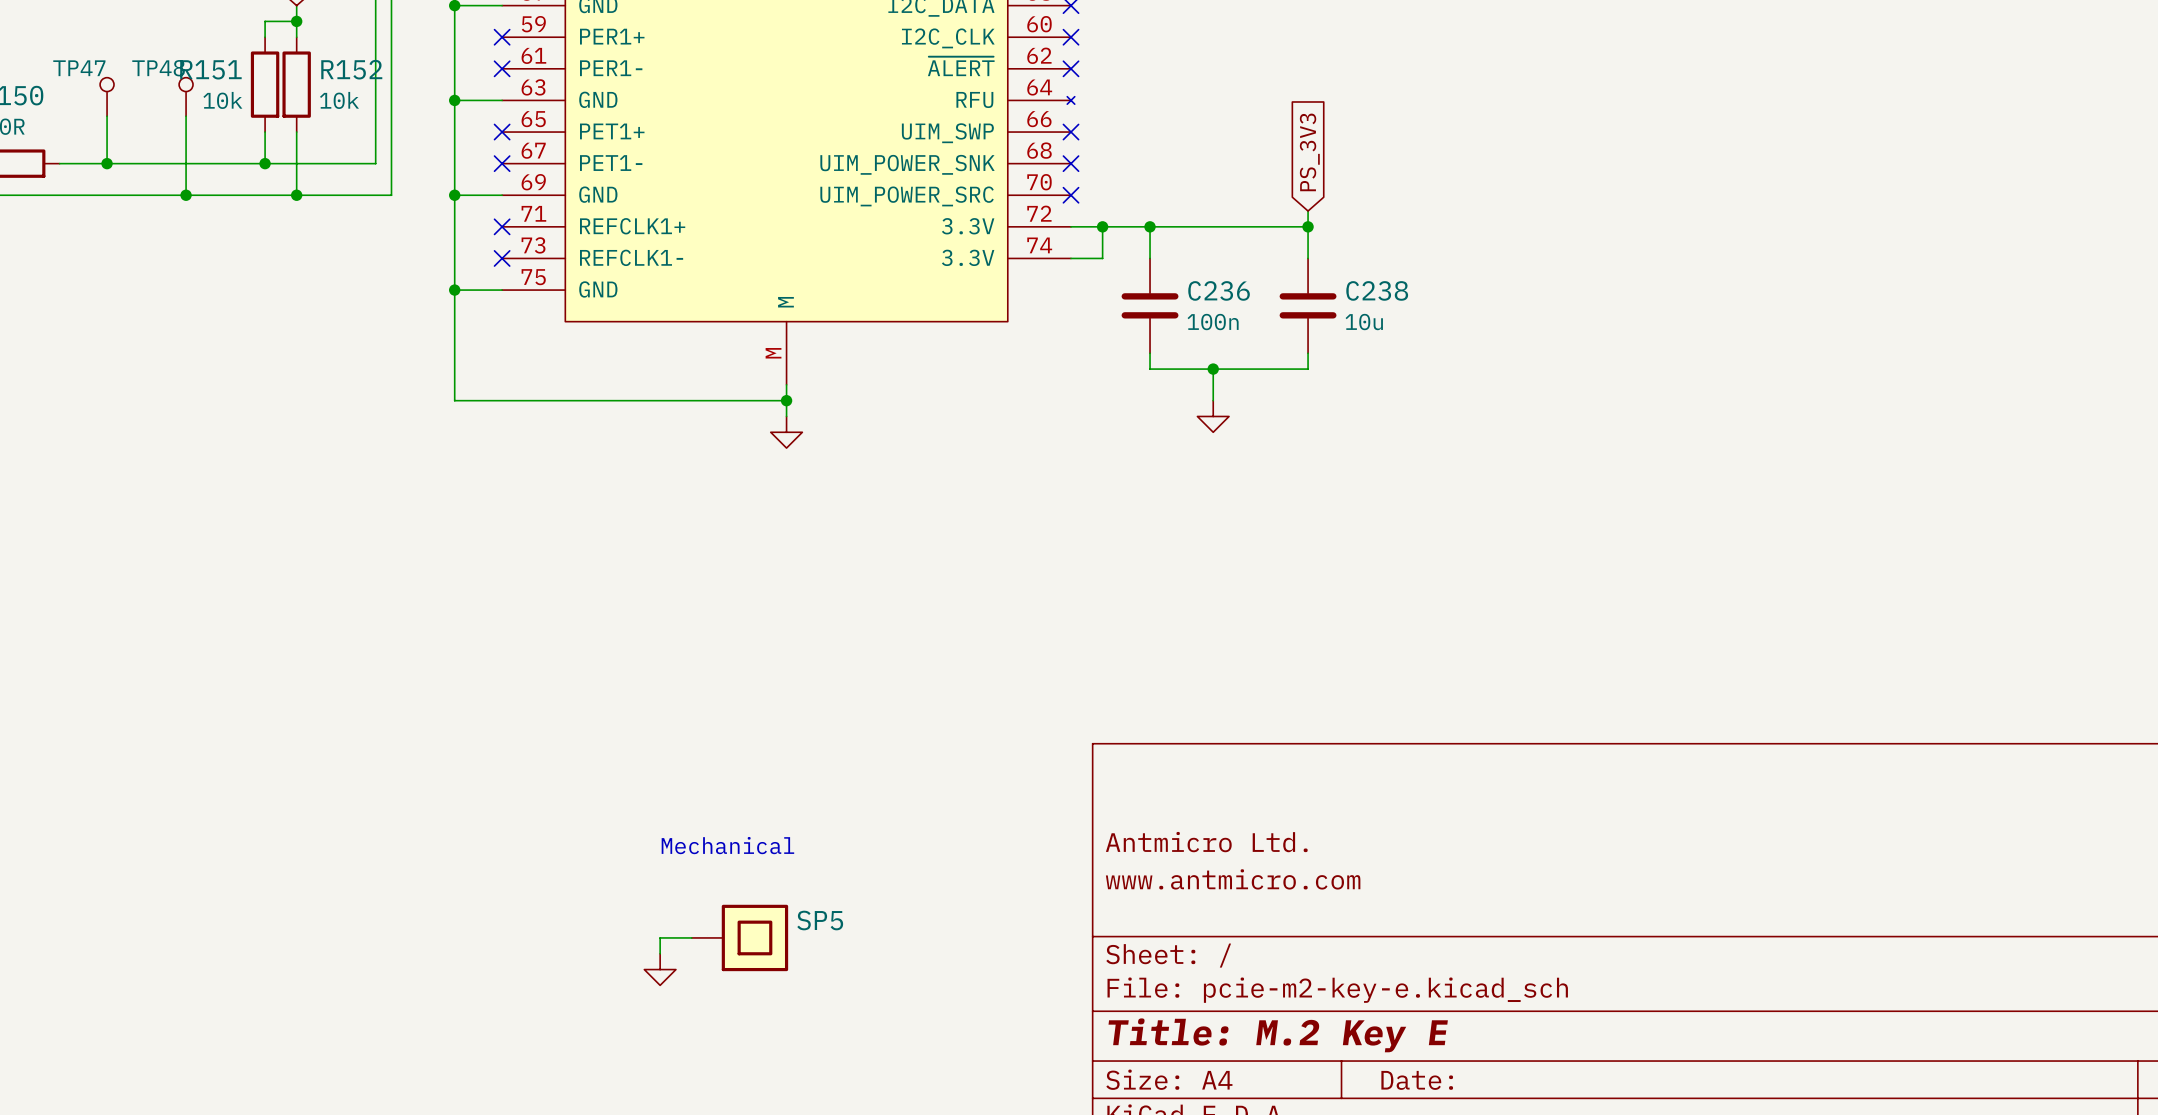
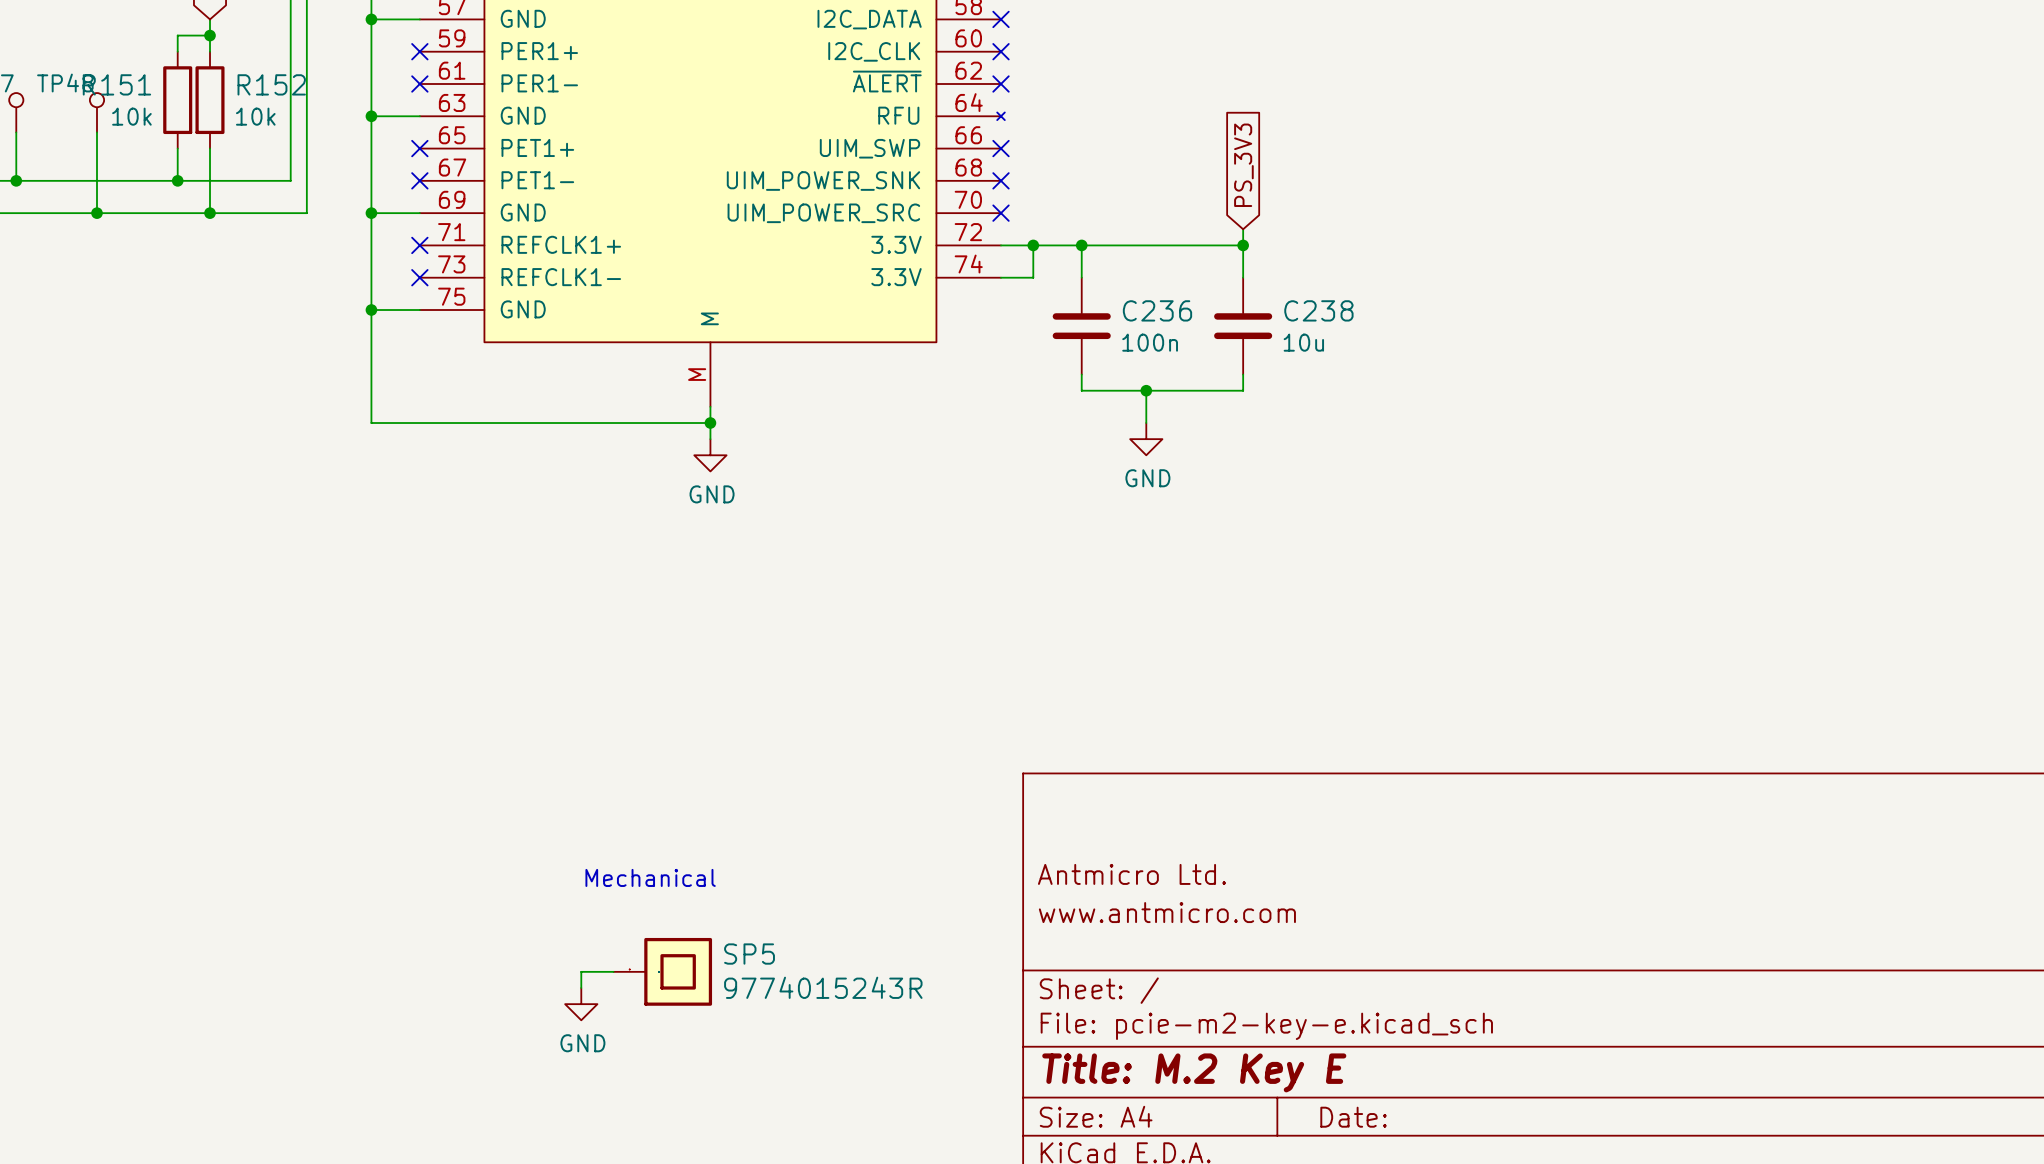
power symbol text: none -> GND (1147, 478)
power symbol text: none -> GND (712, 494)
SP5 value: none -> 9774015243R (823, 987)
power symbol text: none -> GND (582, 1043)

